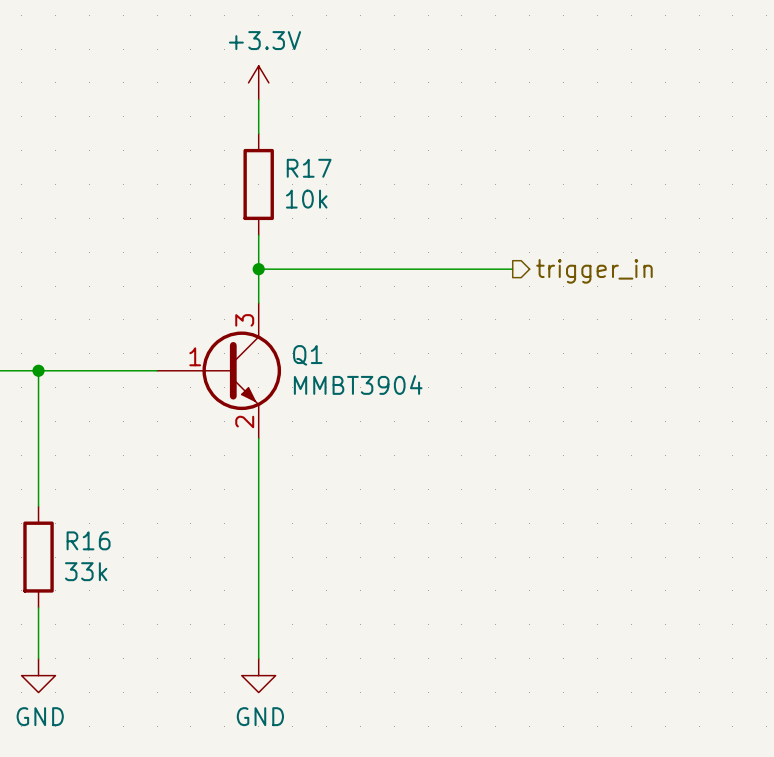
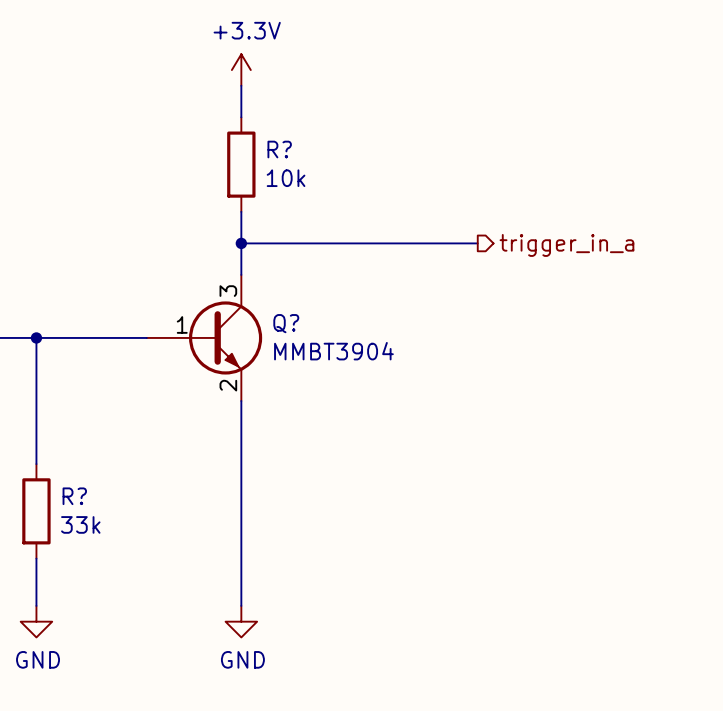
R17 name: R17 (309, 168) -> R? (279, 149)
hierarchical label: trigger_in (594, 271) -> trigger_in_a (566, 245)
Q1 name: Q1 (307, 355) -> Q? (286, 323)
R16 name: R16 (88, 540) -> R? (74, 496)

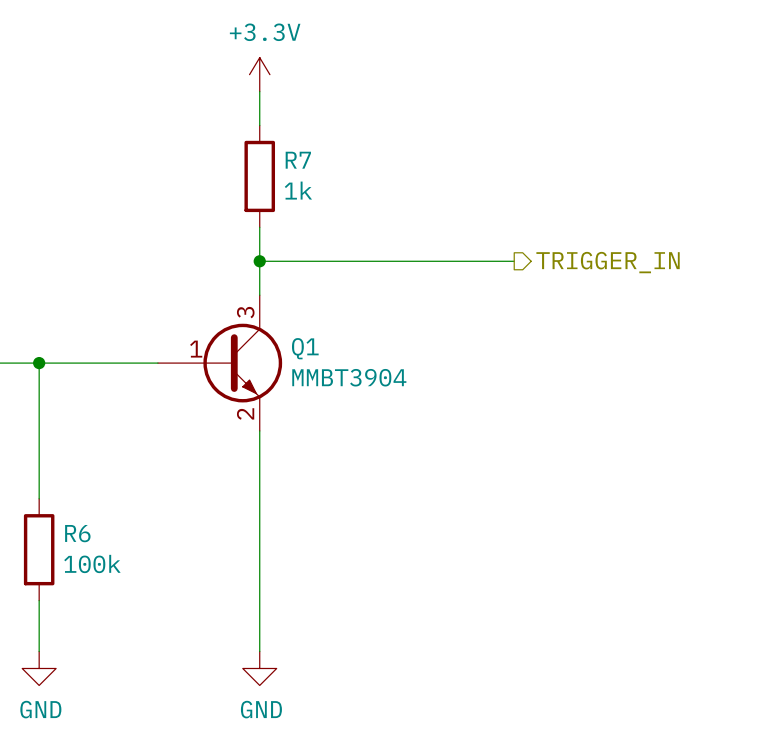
R? name: R? (279, 149) -> R7 (298, 160)
R? value: 10k (286, 178) -> 1k (298, 190)
hierarchical label: trigger_in_a (566, 245) -> TRIGGER_IN (608, 262)
Q? name: Q? (286, 323) -> Q1 (305, 348)
R? name: R? (74, 496) -> R6 (77, 533)
R? value: 33k (80, 524) -> 100k (92, 563)

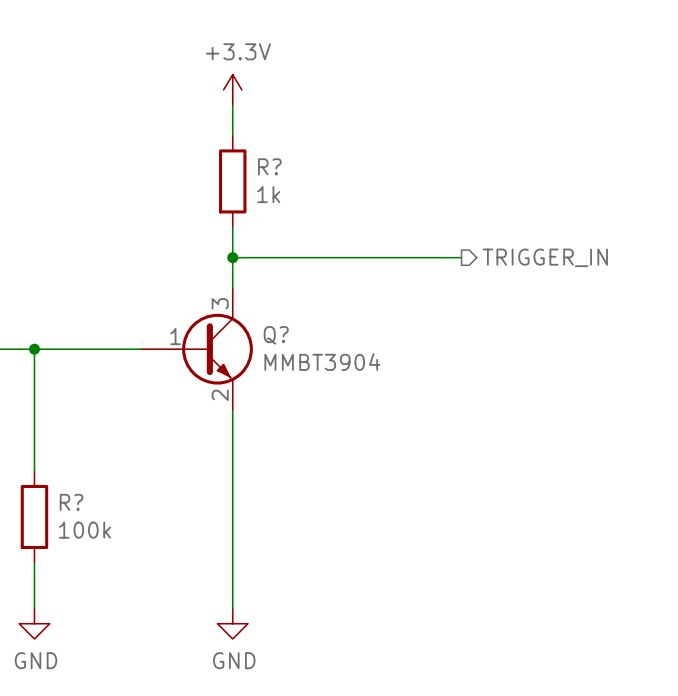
R7 name: R7 (298, 160) -> R? (269, 166)
Q1 name: Q1 (305, 348) -> Q? (276, 335)
R6 name: R6 (77, 533) -> R? (71, 502)

